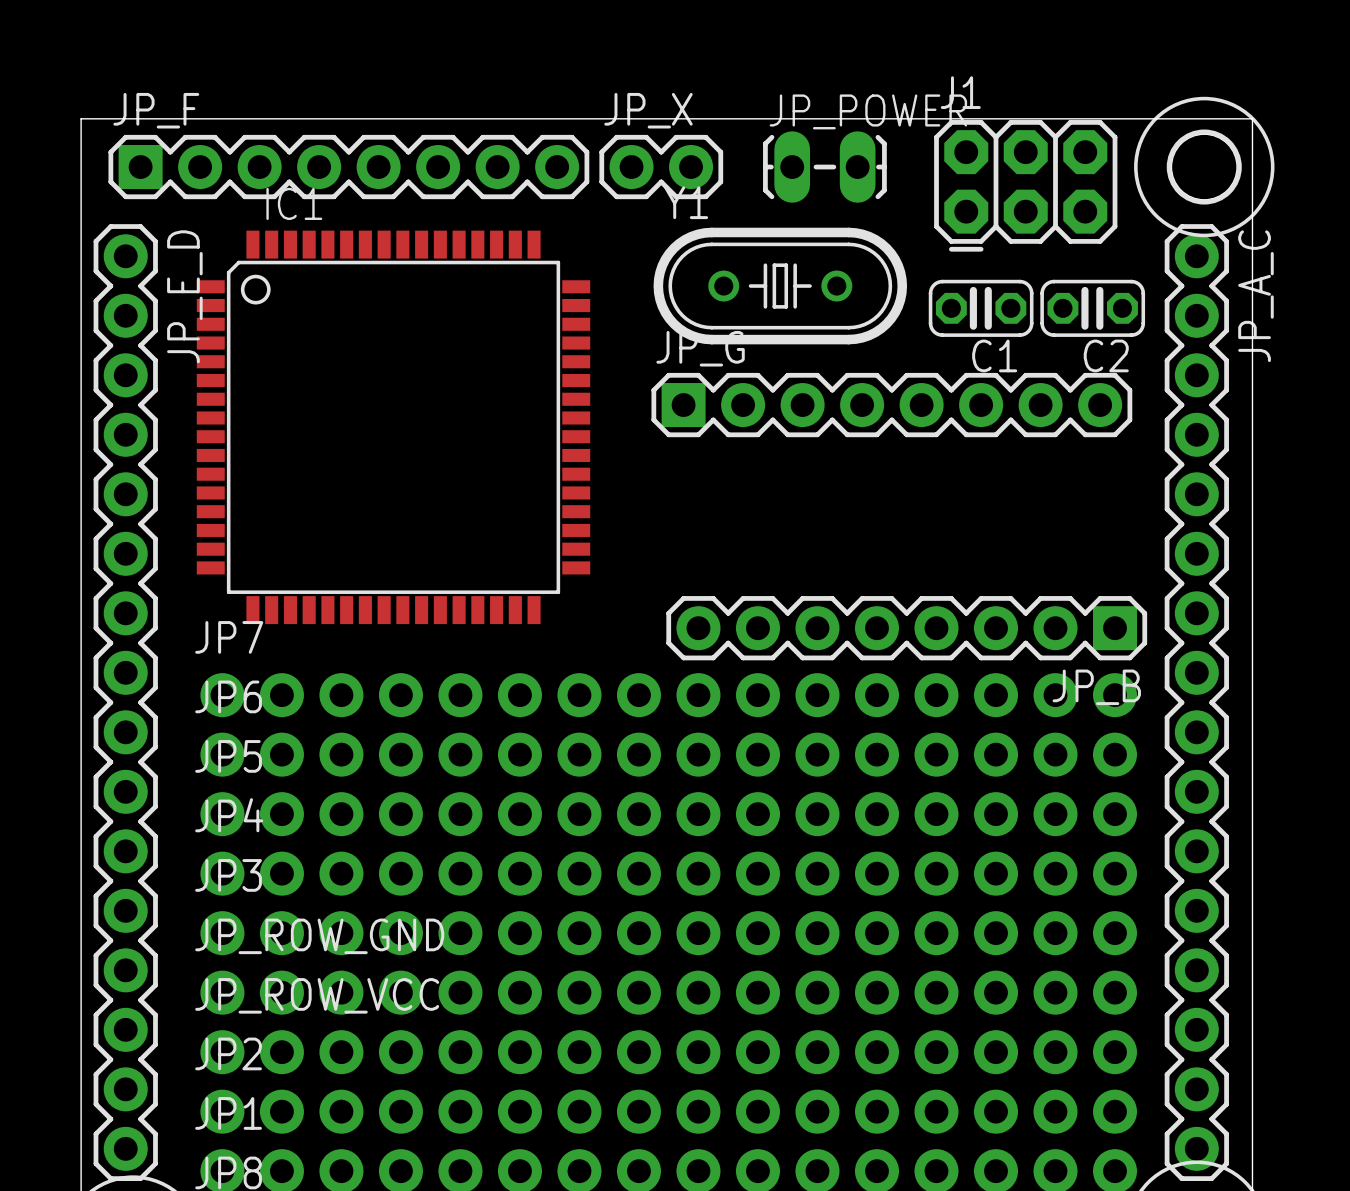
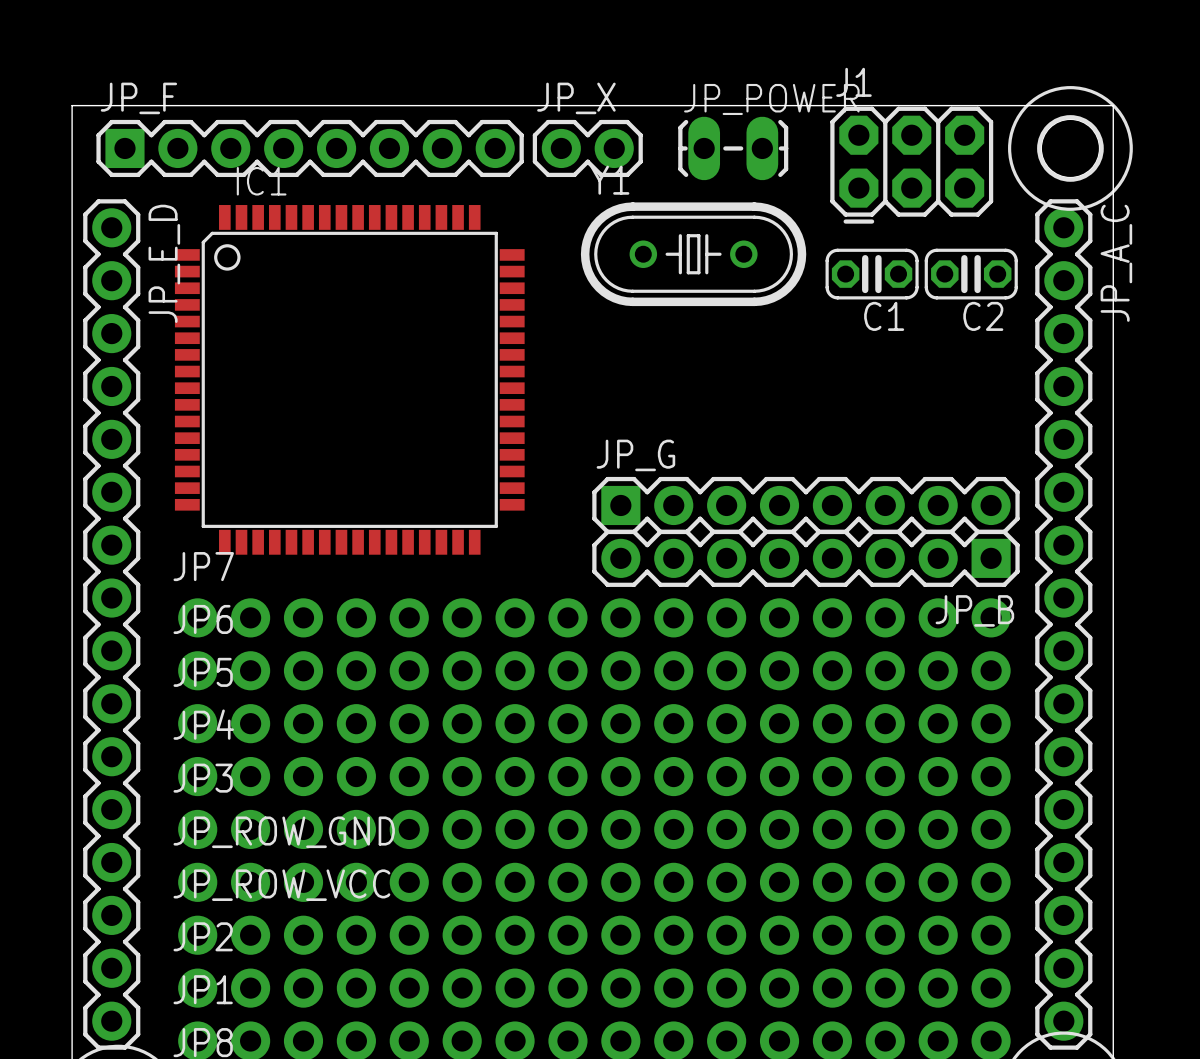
JP_G position: (891, 405) -> (805, 505)

